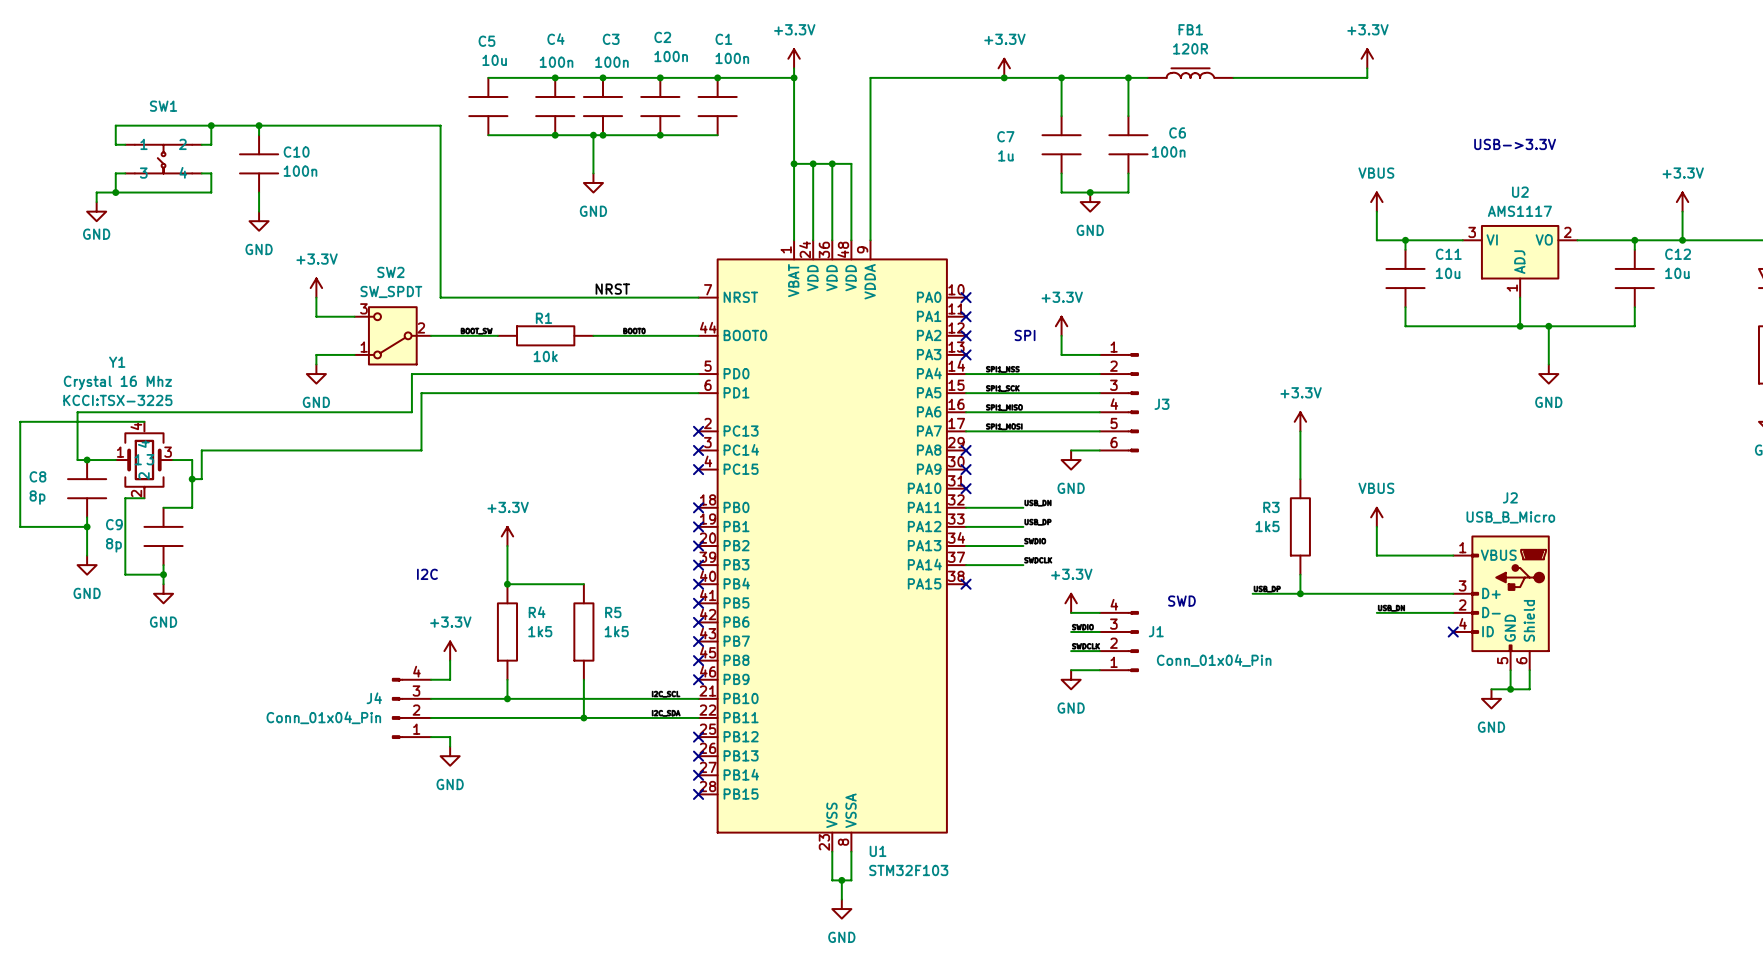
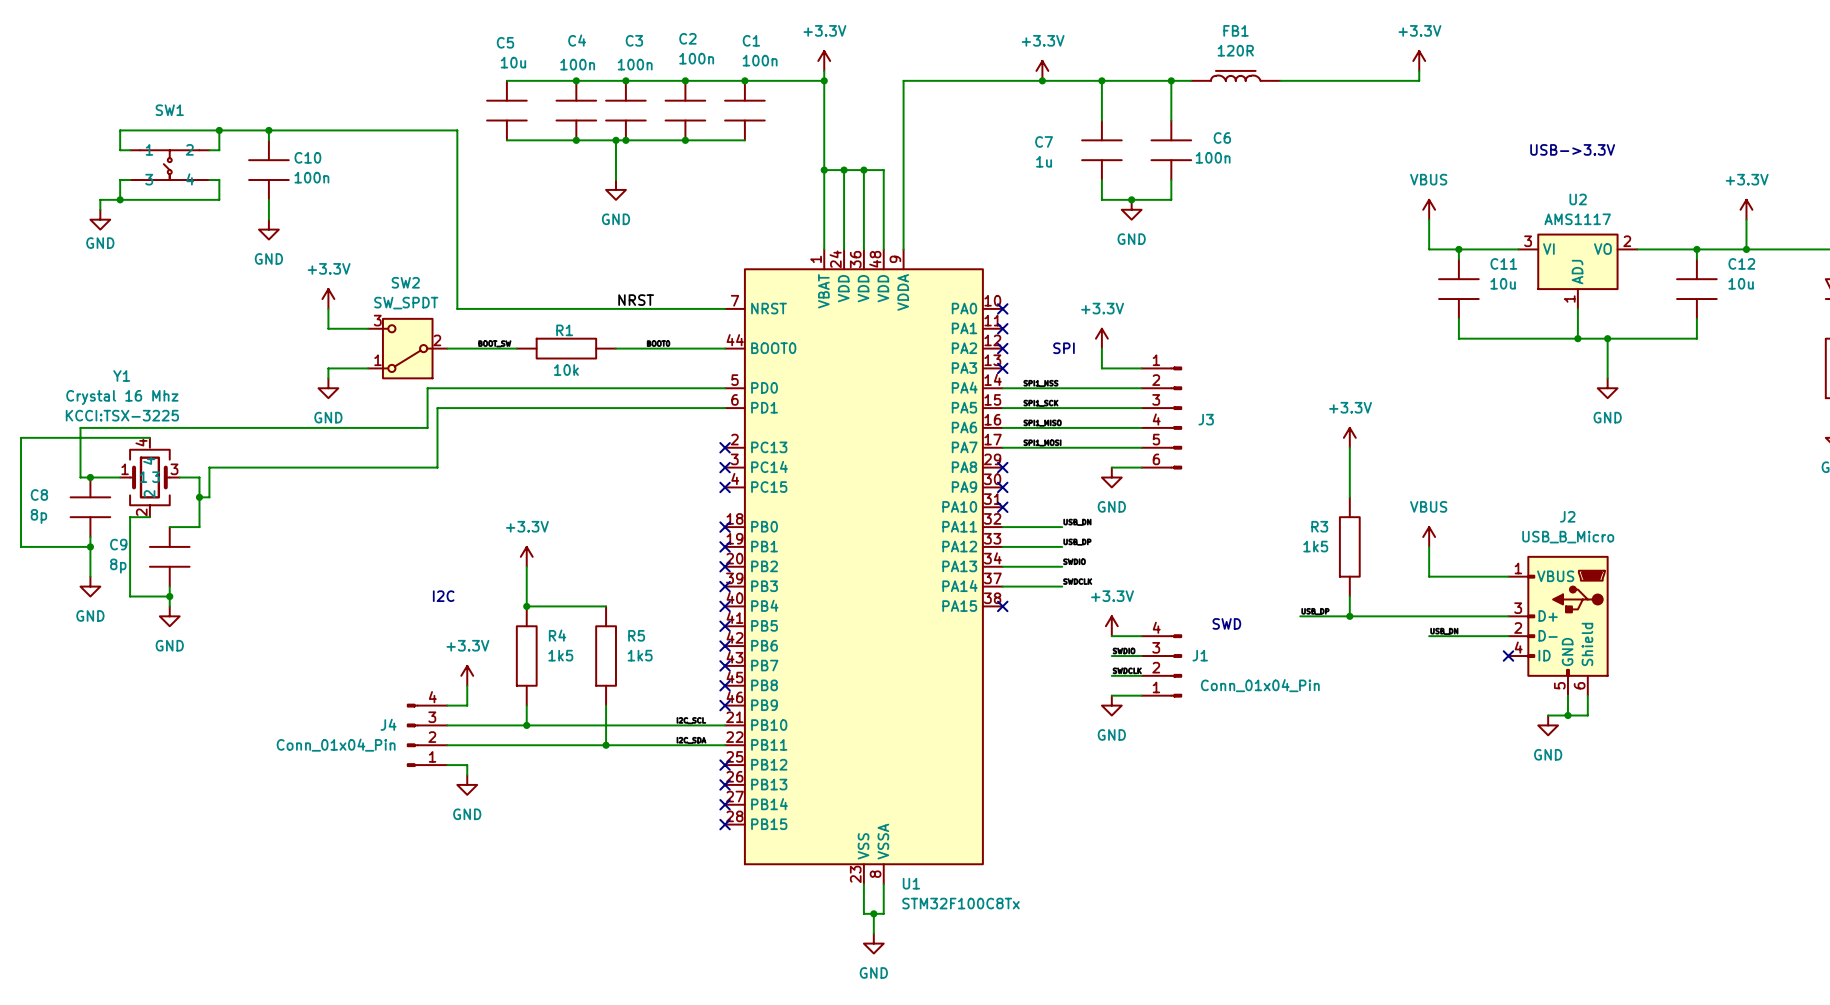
U1 value: STM32F103 (908, 870) -> STM32F100C8Tx (960, 903)

